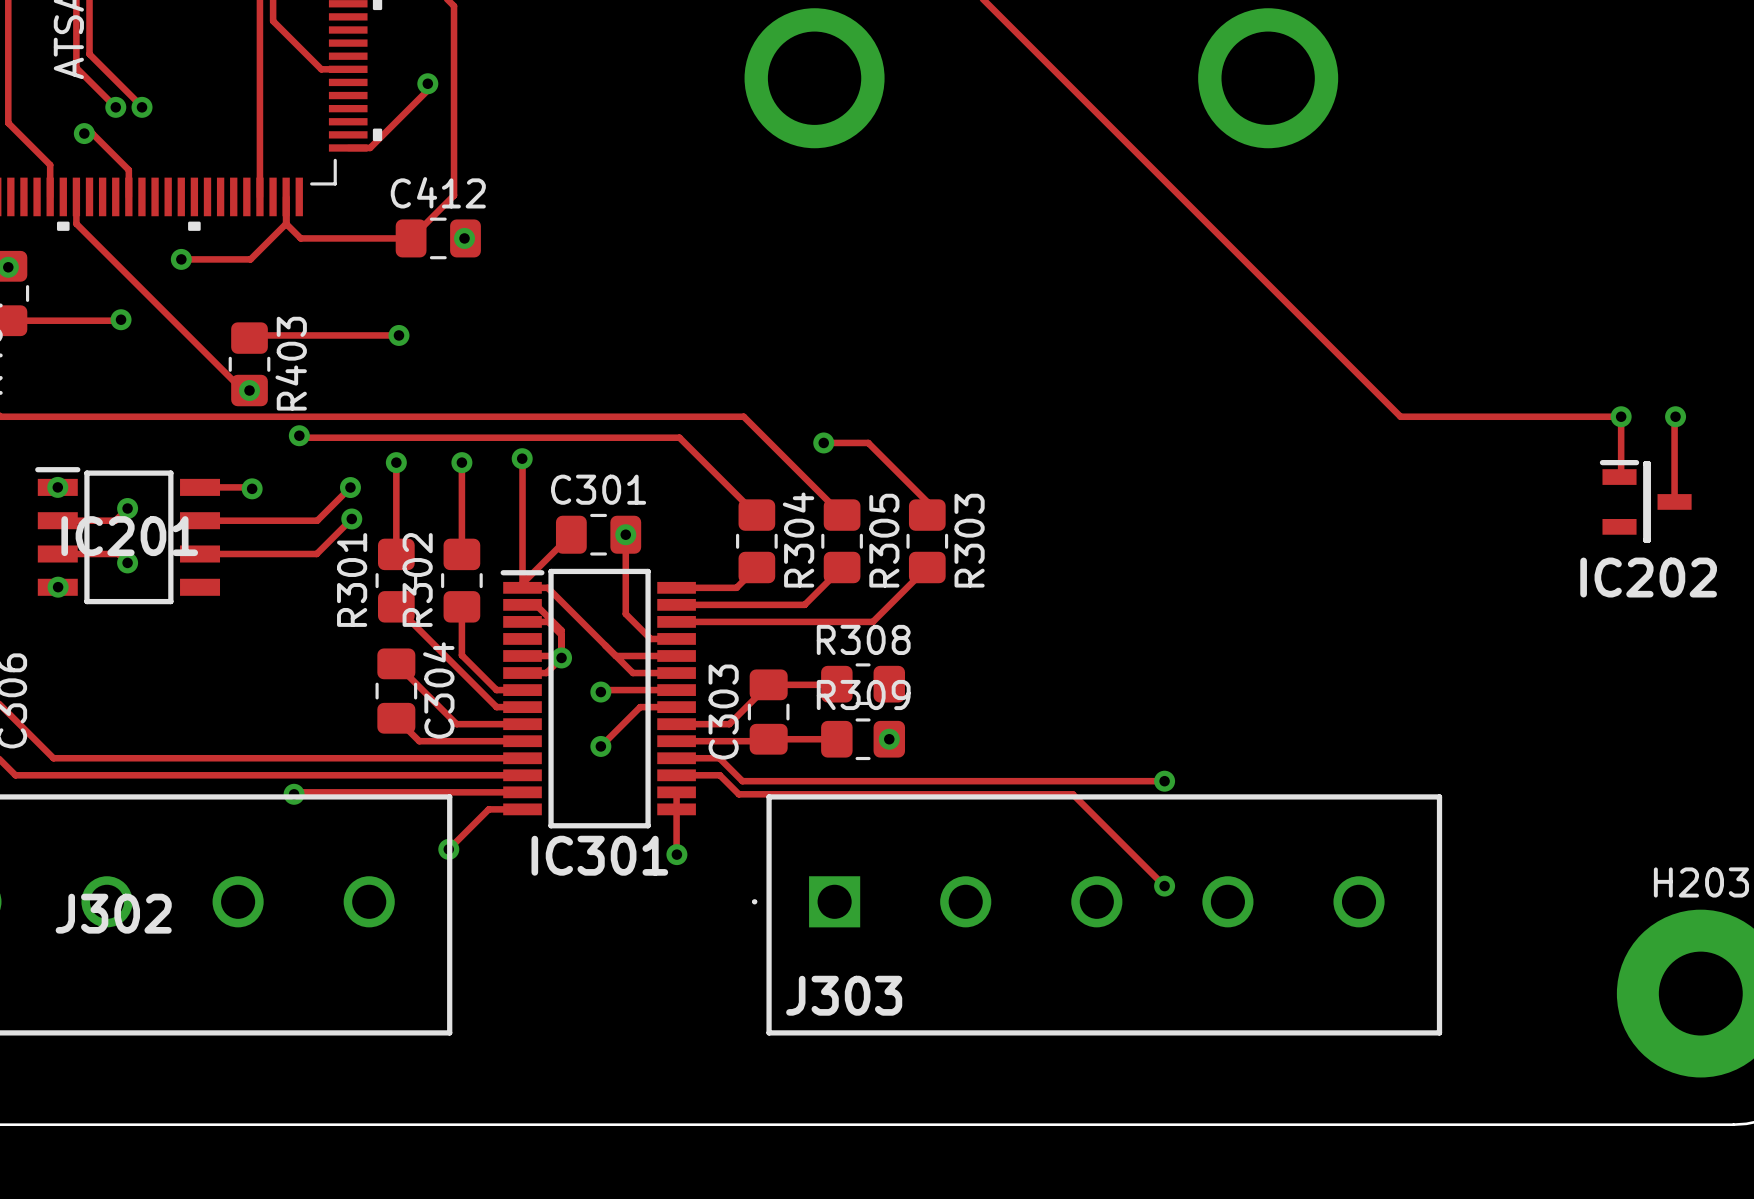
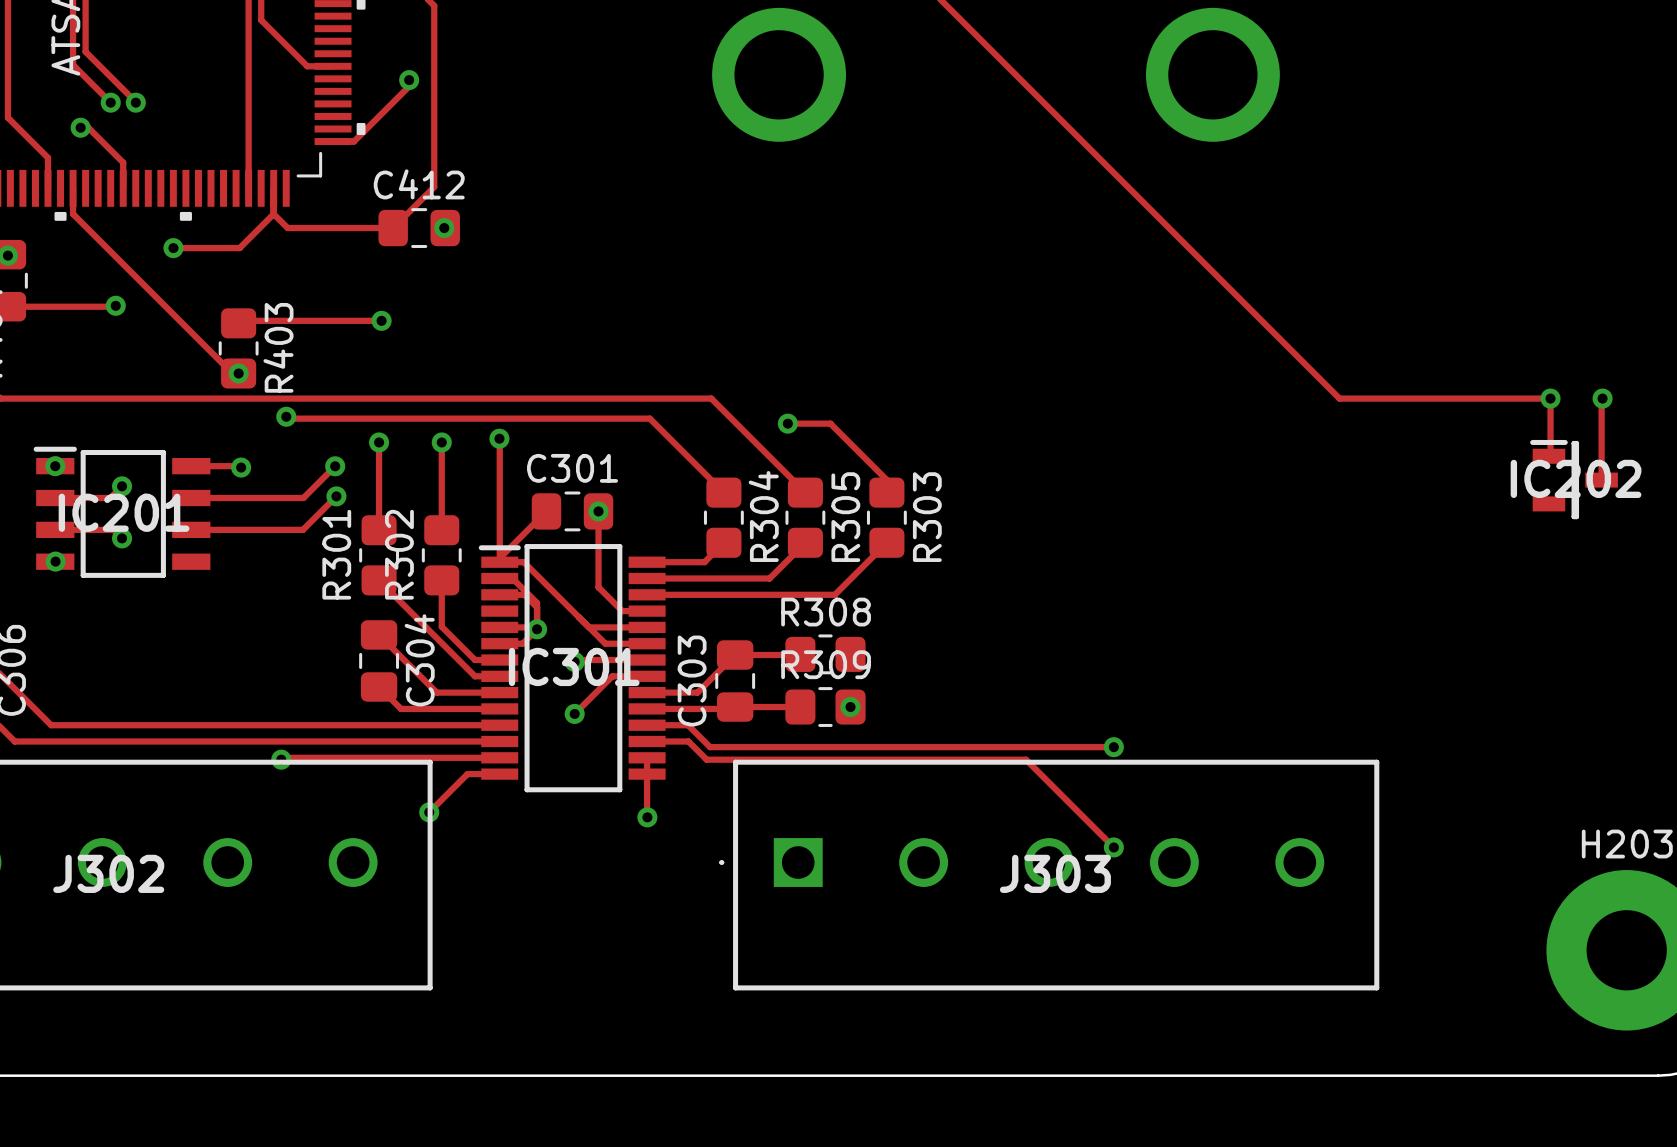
IC202 name position: IC202 (1648, 577) -> IC202 (1576, 478)
IC301 name position: IC301 (599, 855) -> IC301 (574, 666)
J303 name position: J303 (844, 995) -> J303 (1055, 873)

